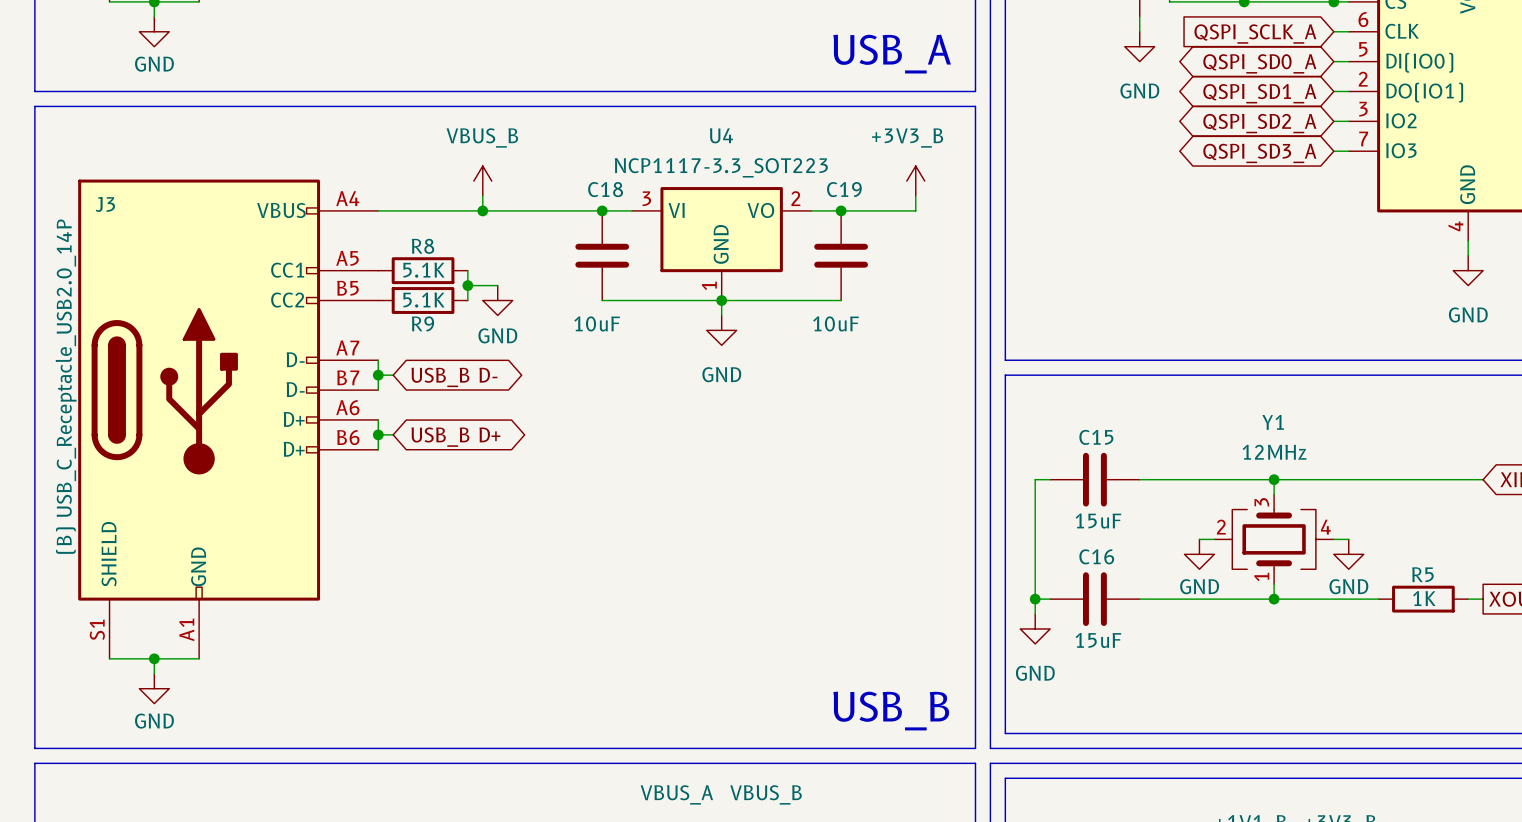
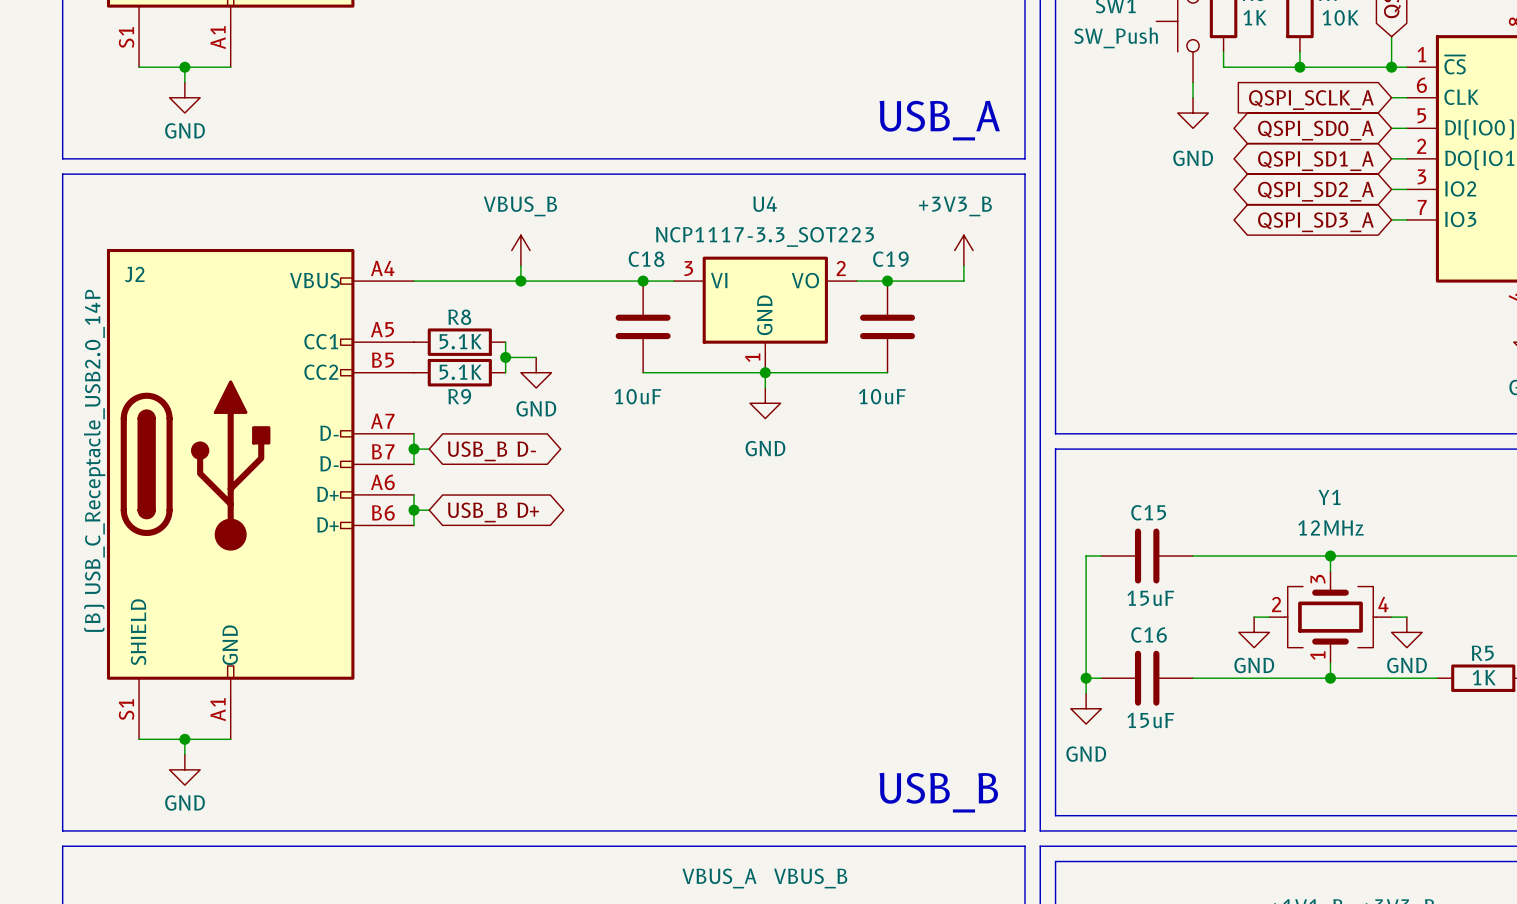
J3 name: J3 (105, 204) -> J2 (134, 274)

